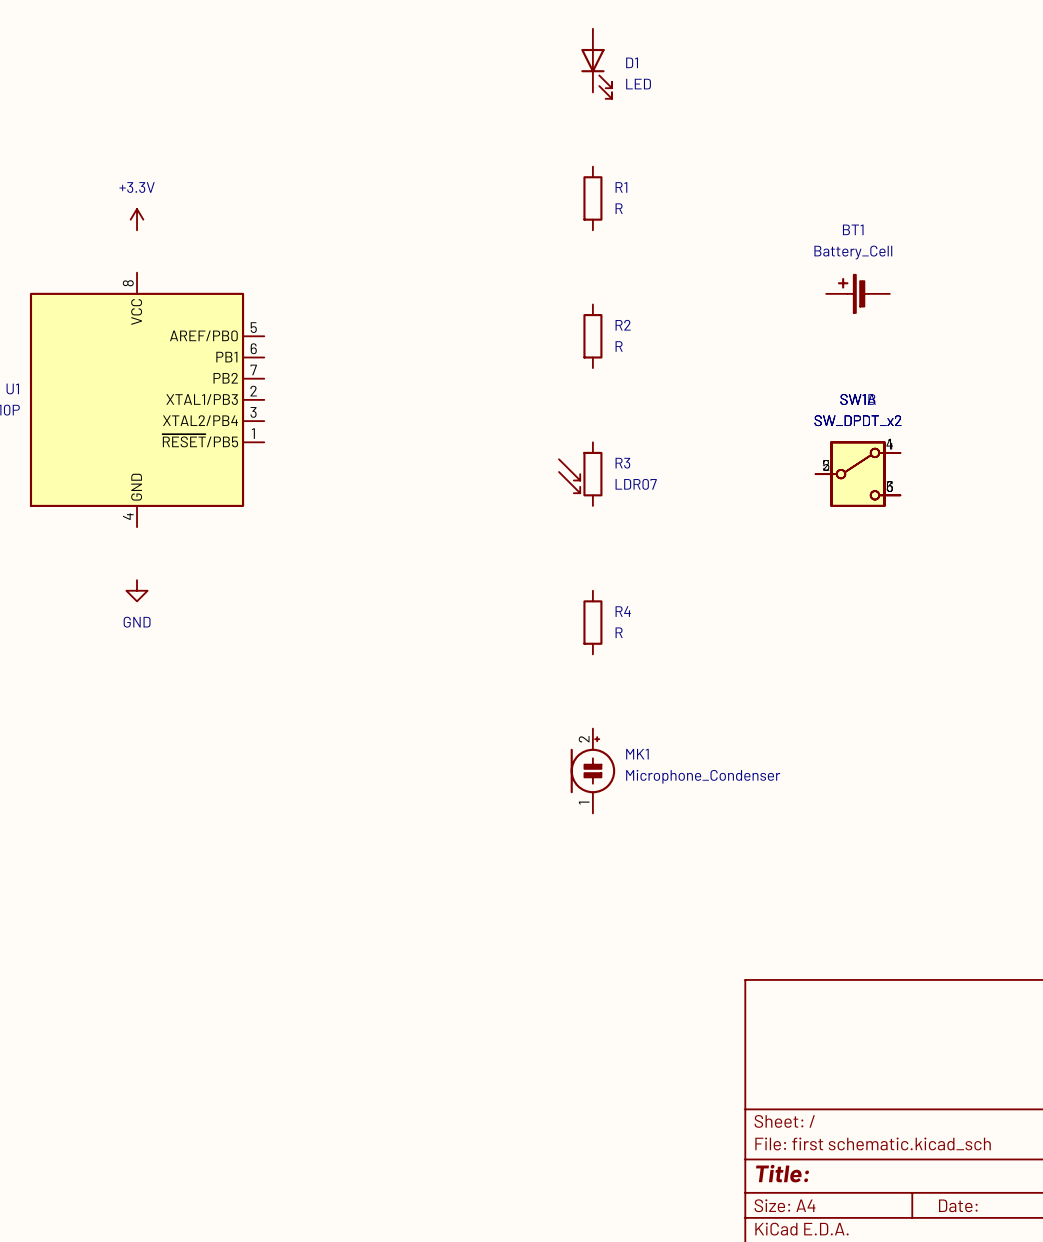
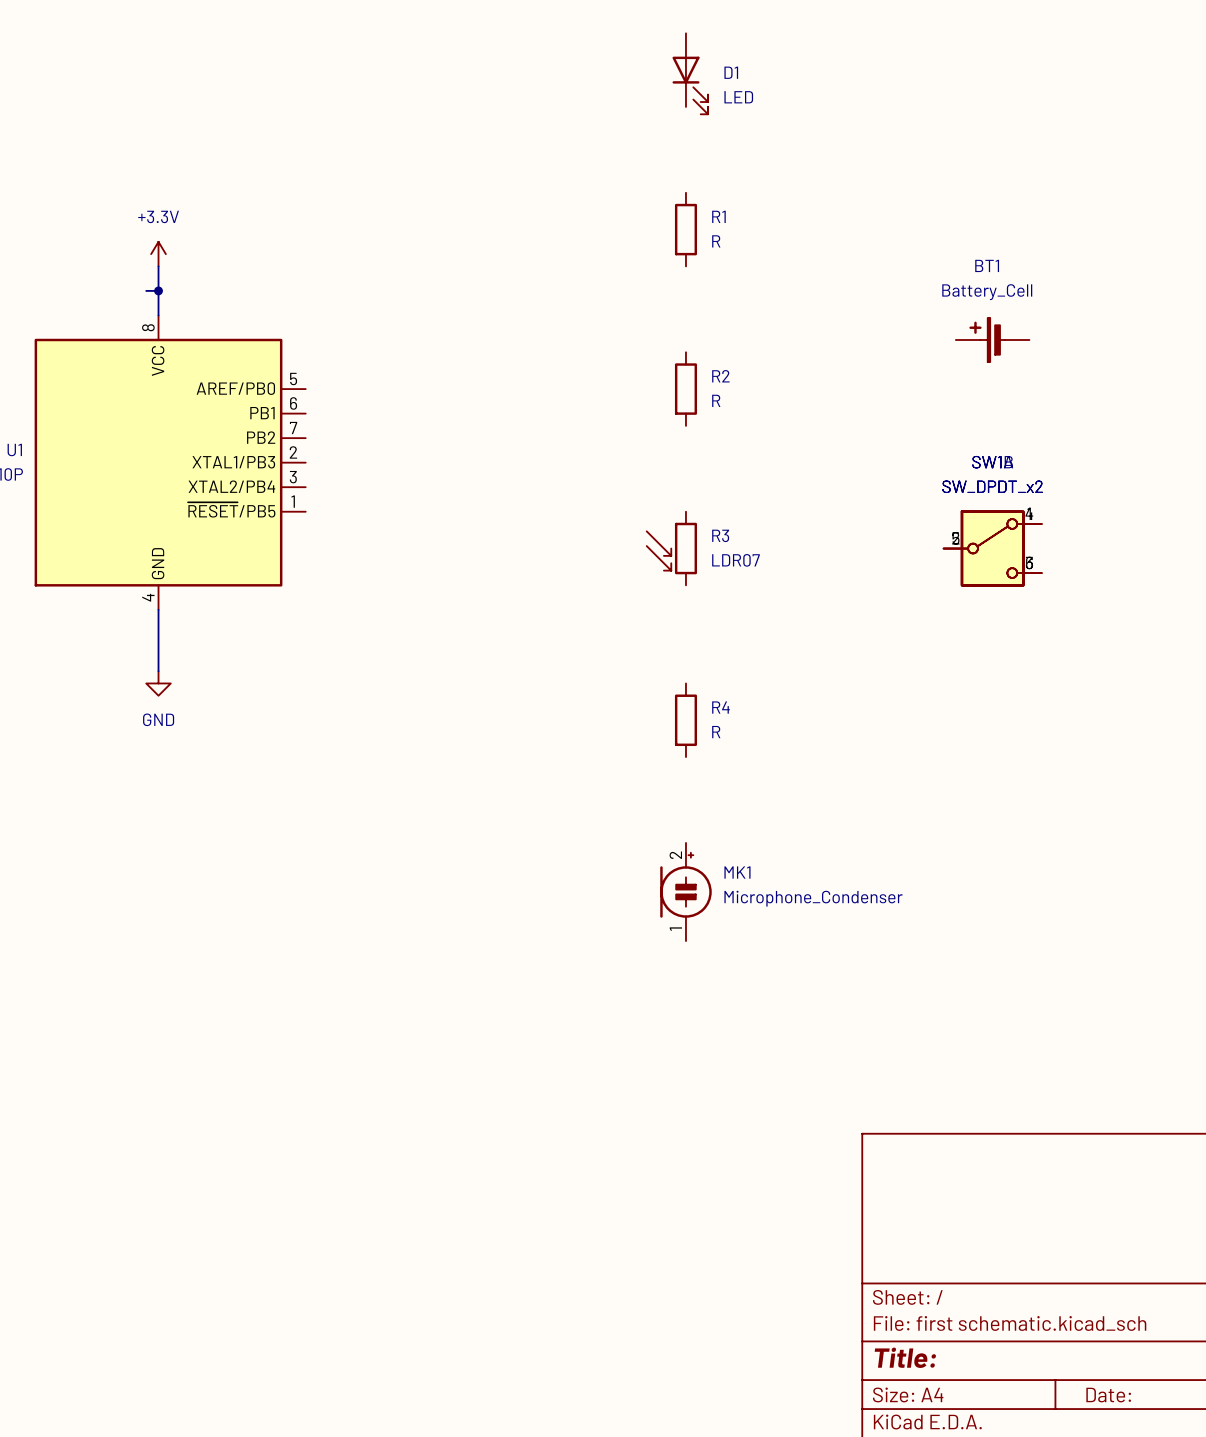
wire: none -> (158, 266) (158, 315)
wire: none -> (146, 290) (158, 290)
junction: none -> (158, 290)
wire: none -> (158, 609) (158, 671)

